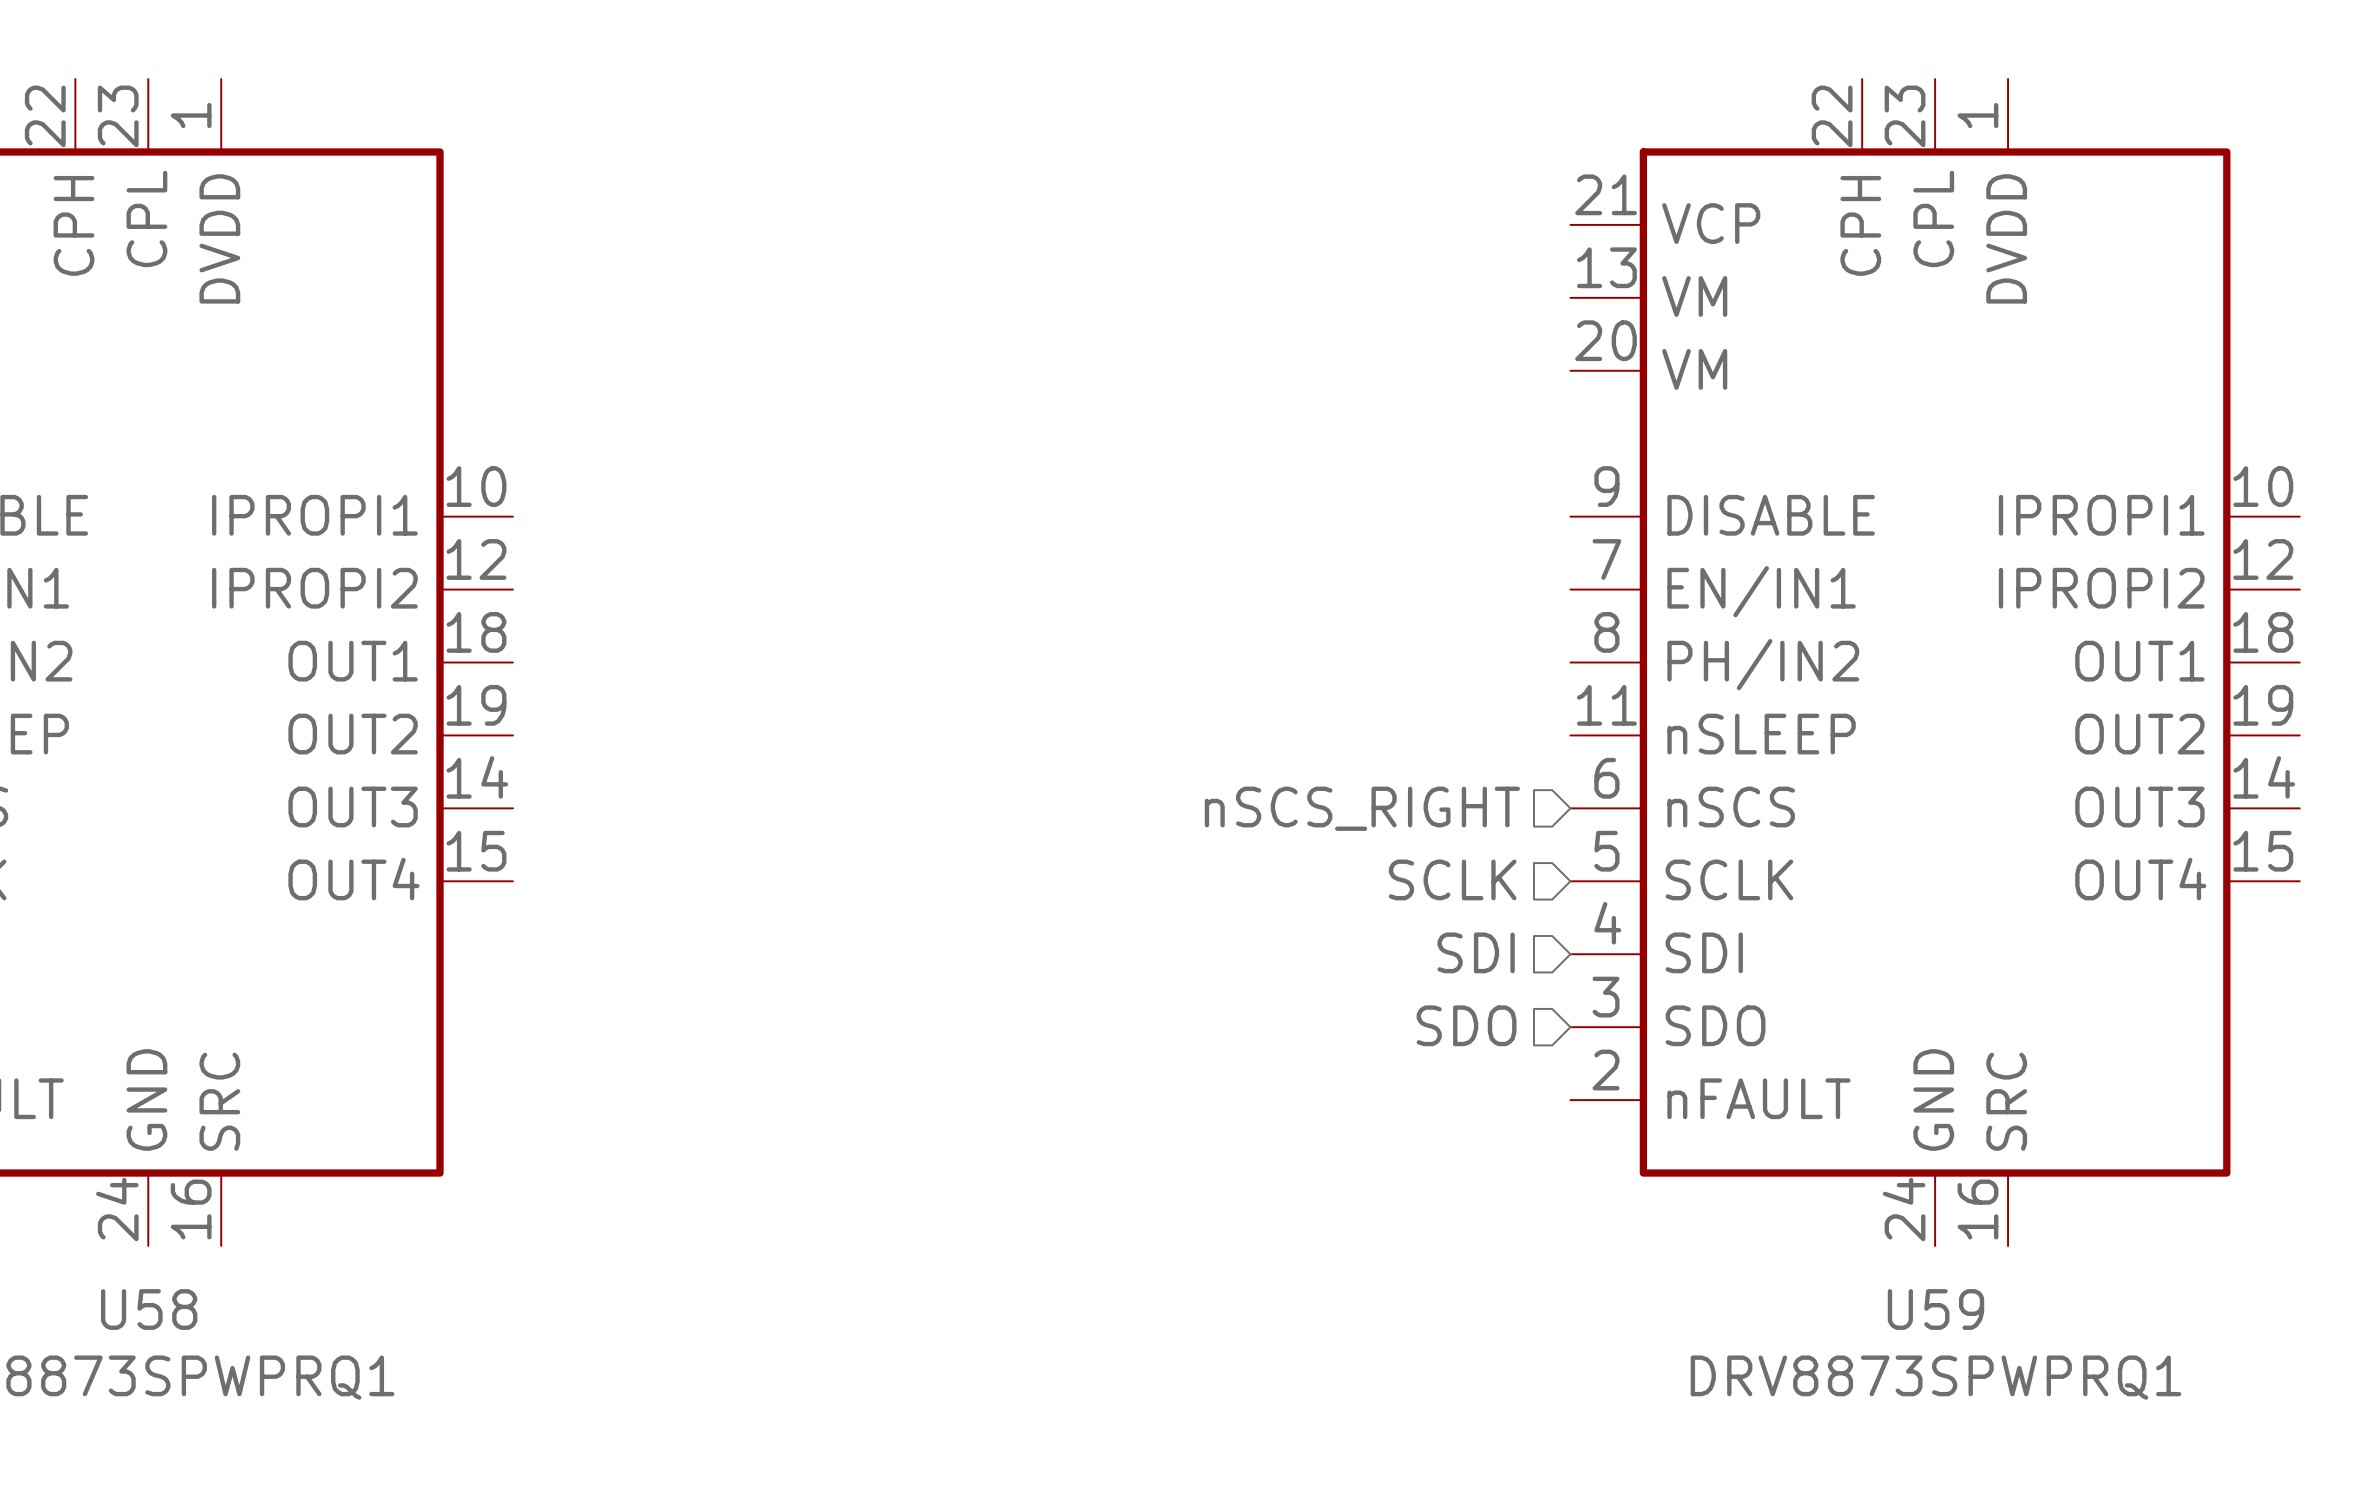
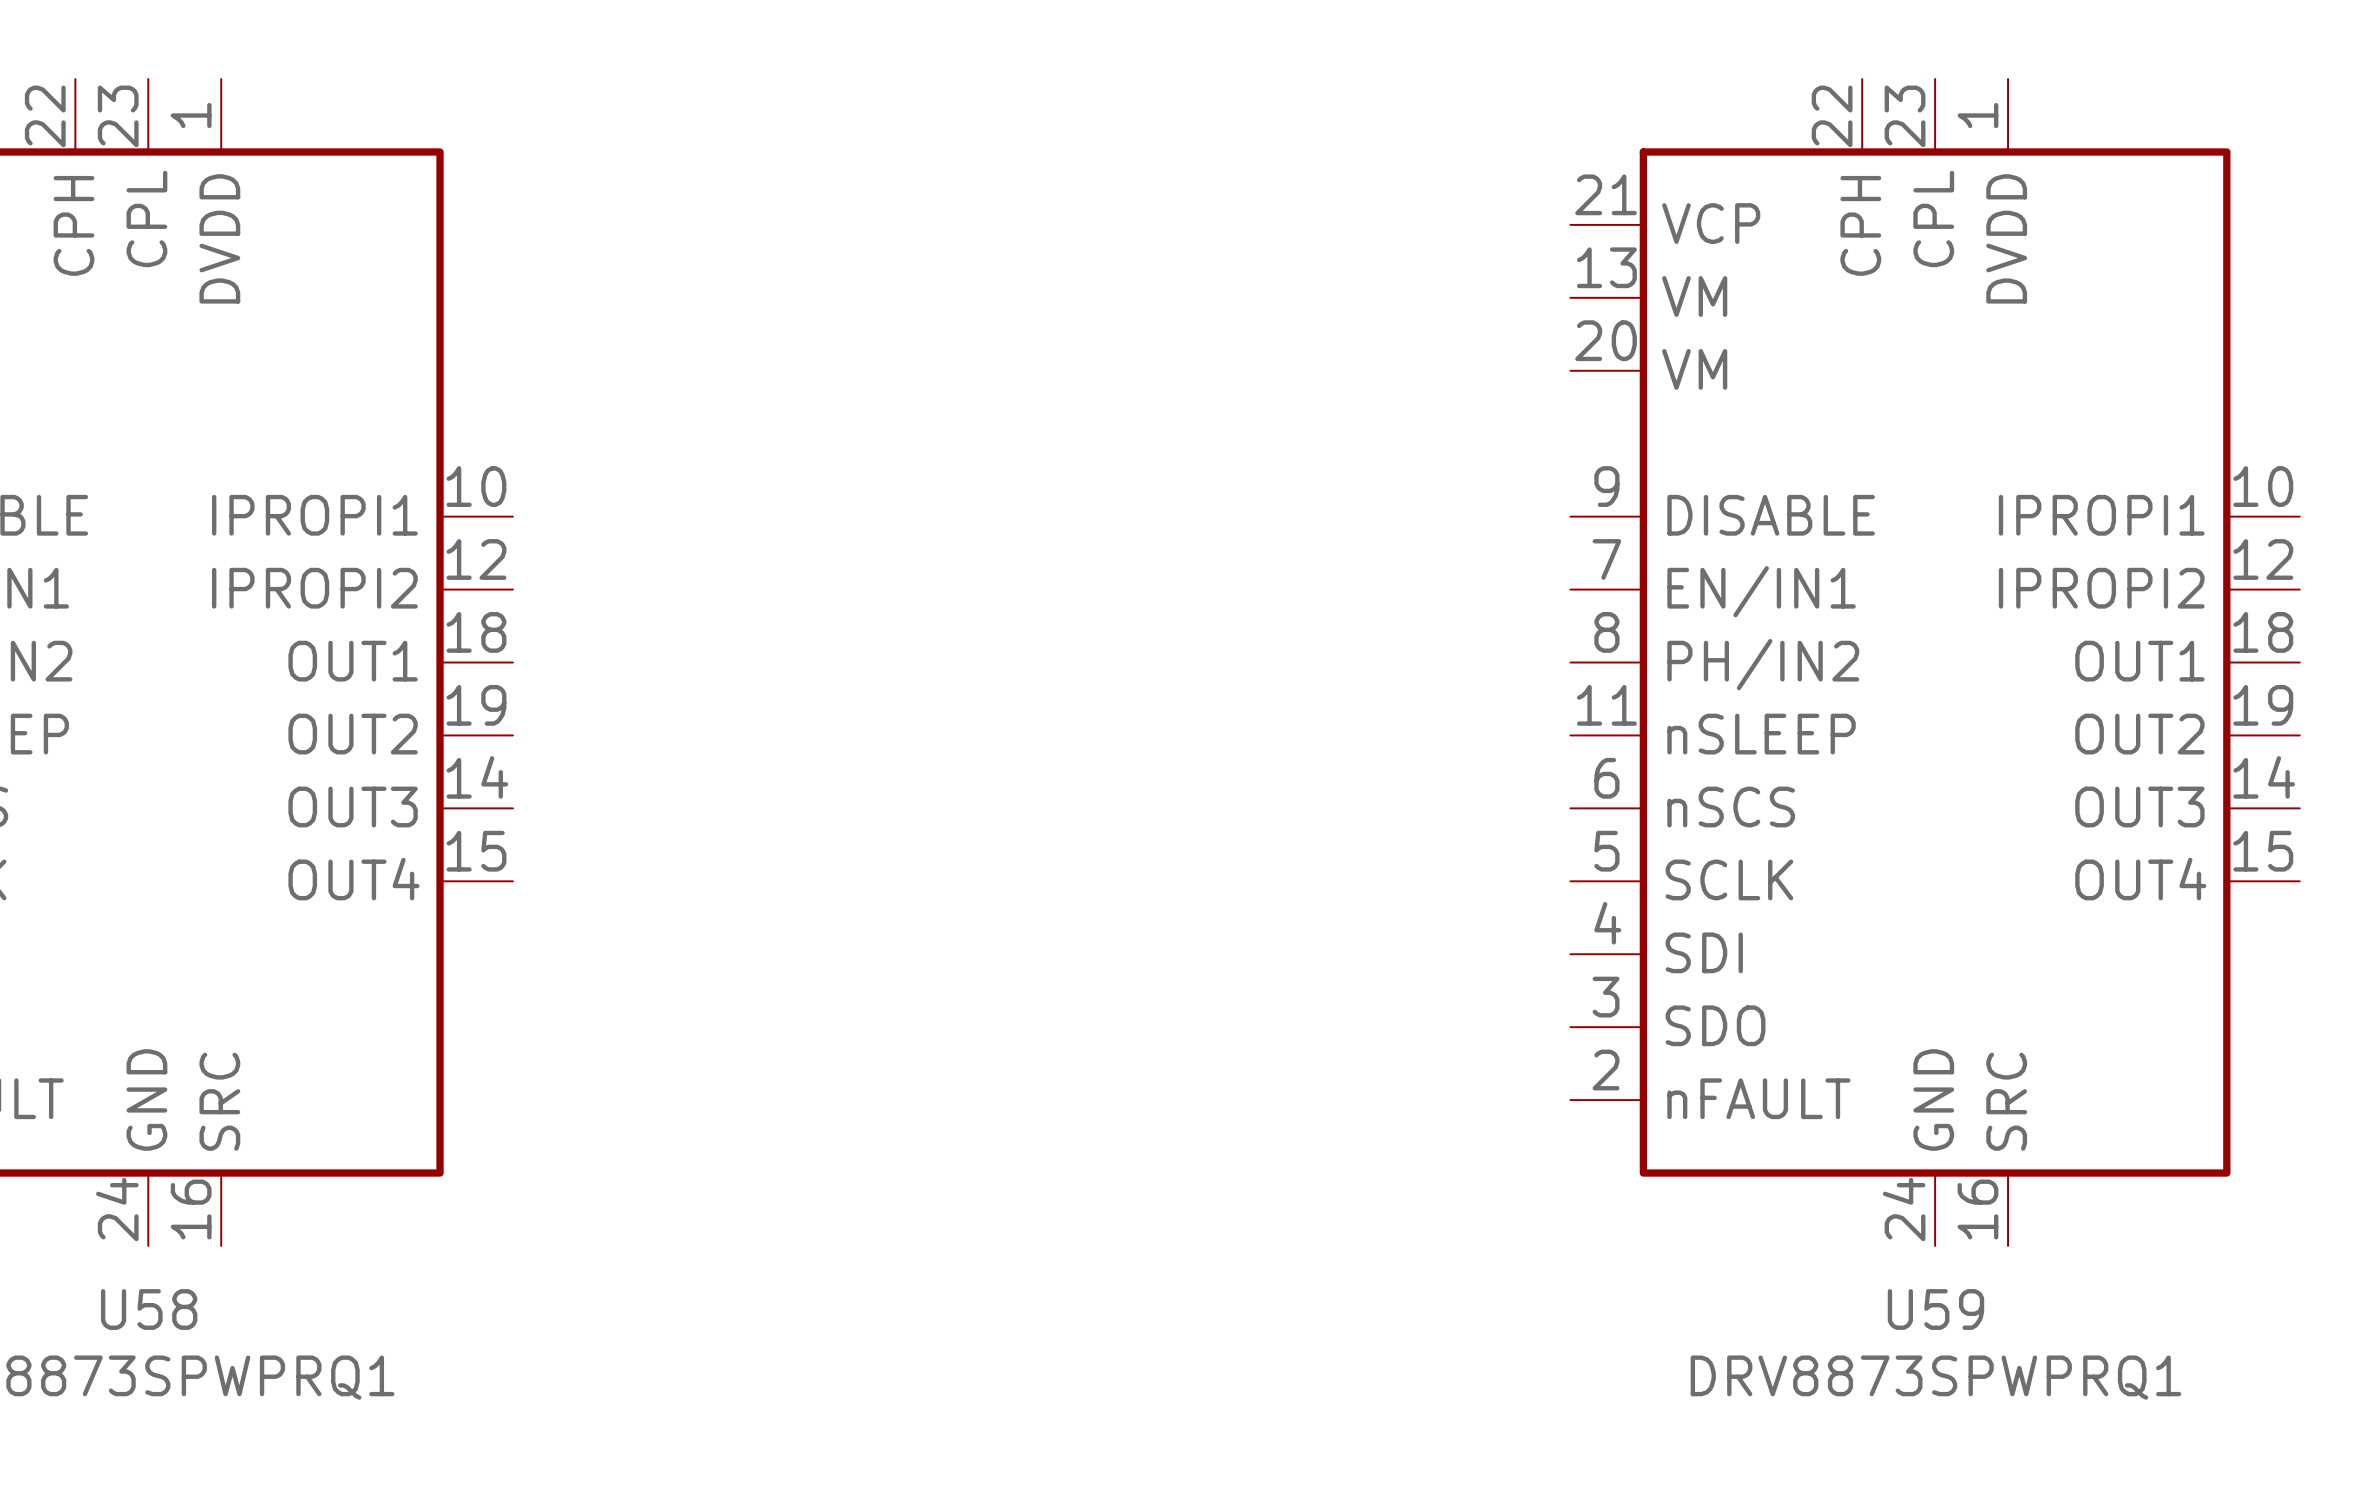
hierarchical label: nSCS_RIGHT (1362, 808) -> none
hierarchical label: SCLK (1452, 879) -> none
hierarchical label: SDI (1476, 952) -> none
hierarchical label: SDO (1466, 1025) -> none

